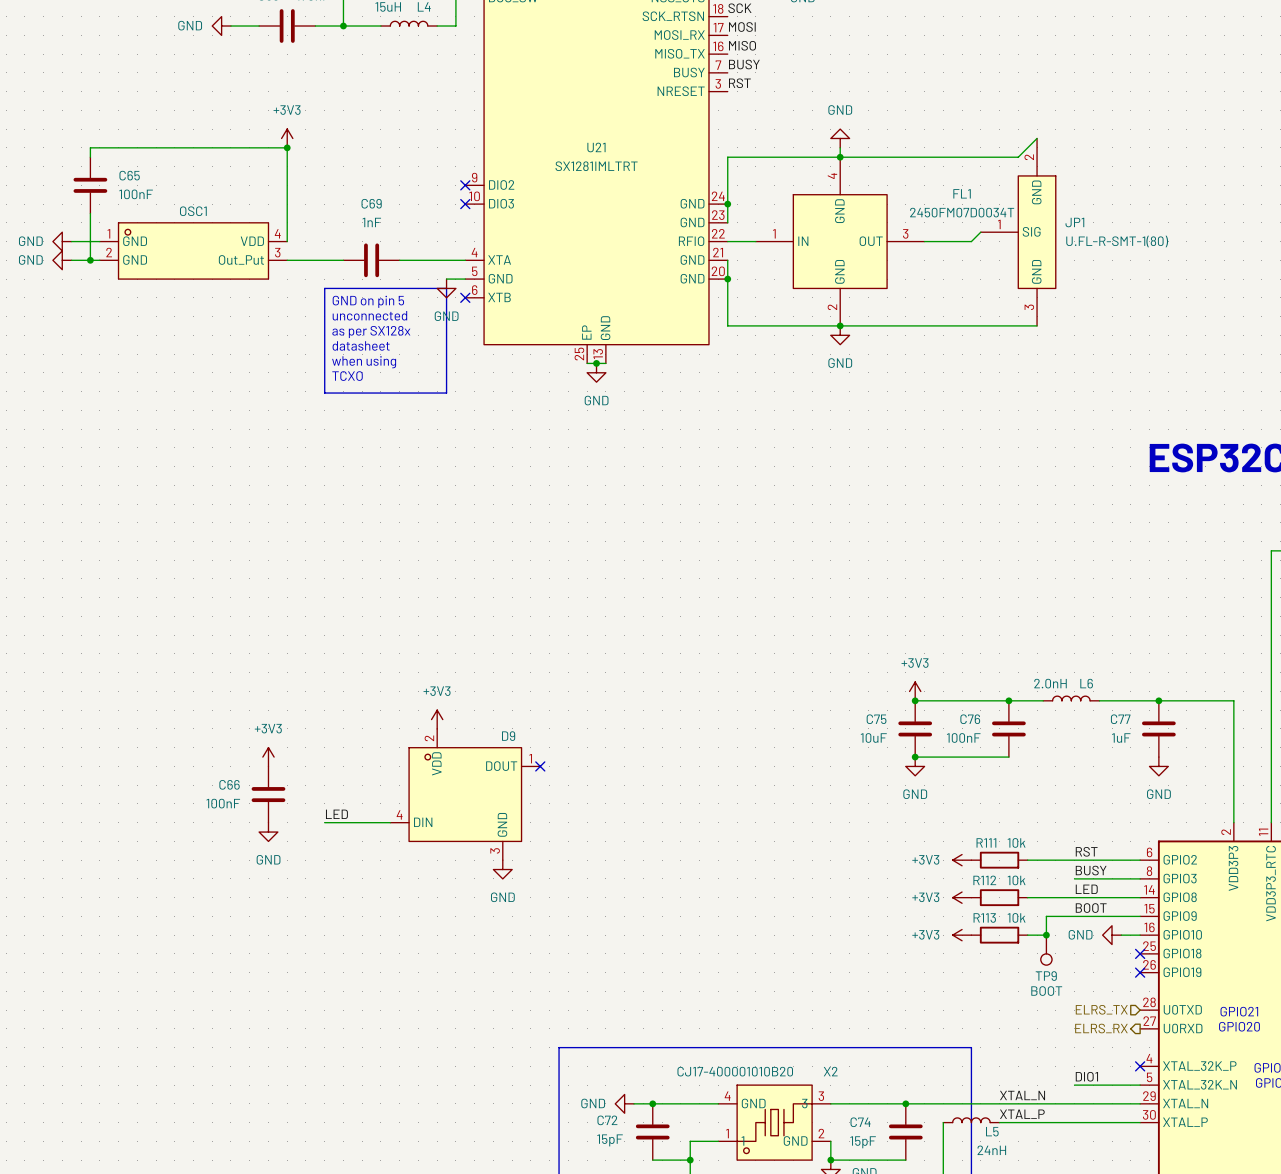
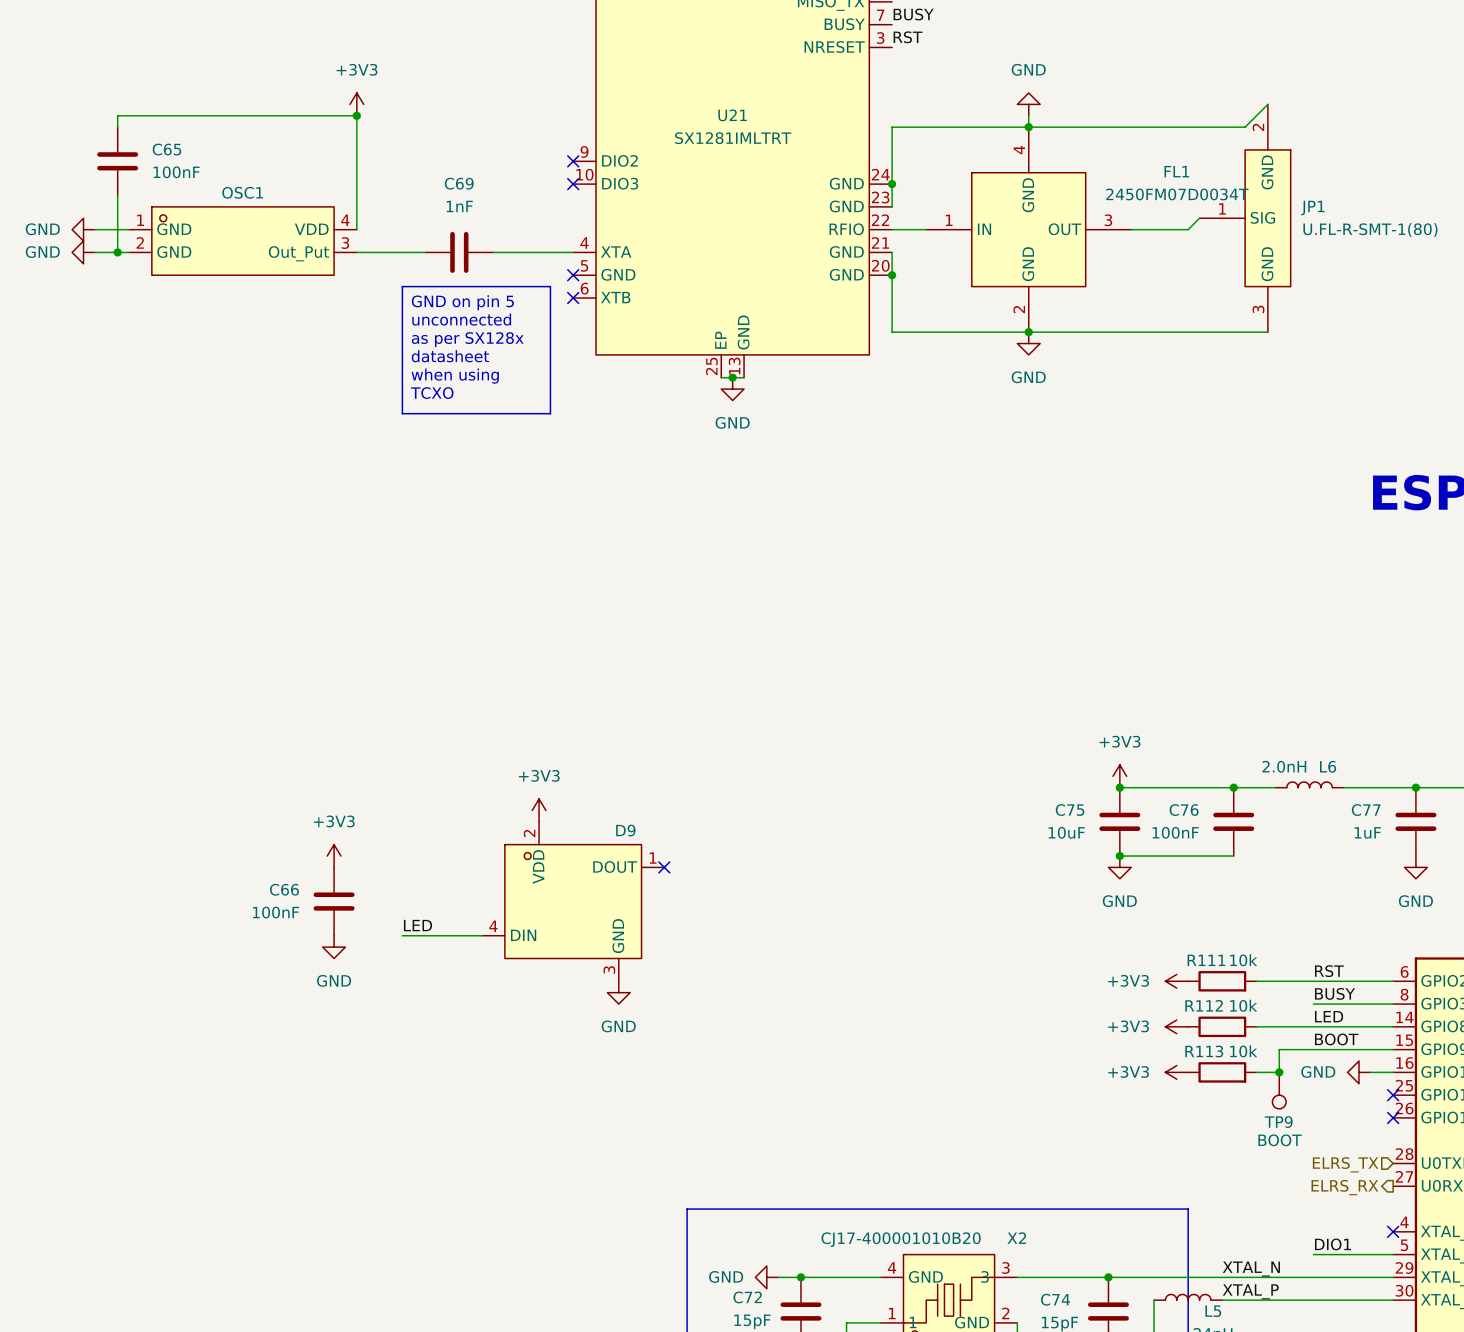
wire: (446, 279) (465, 279) -> none
no-connect mark: none -> (573, 275)
power symbol: GND (446, 288) -> none

